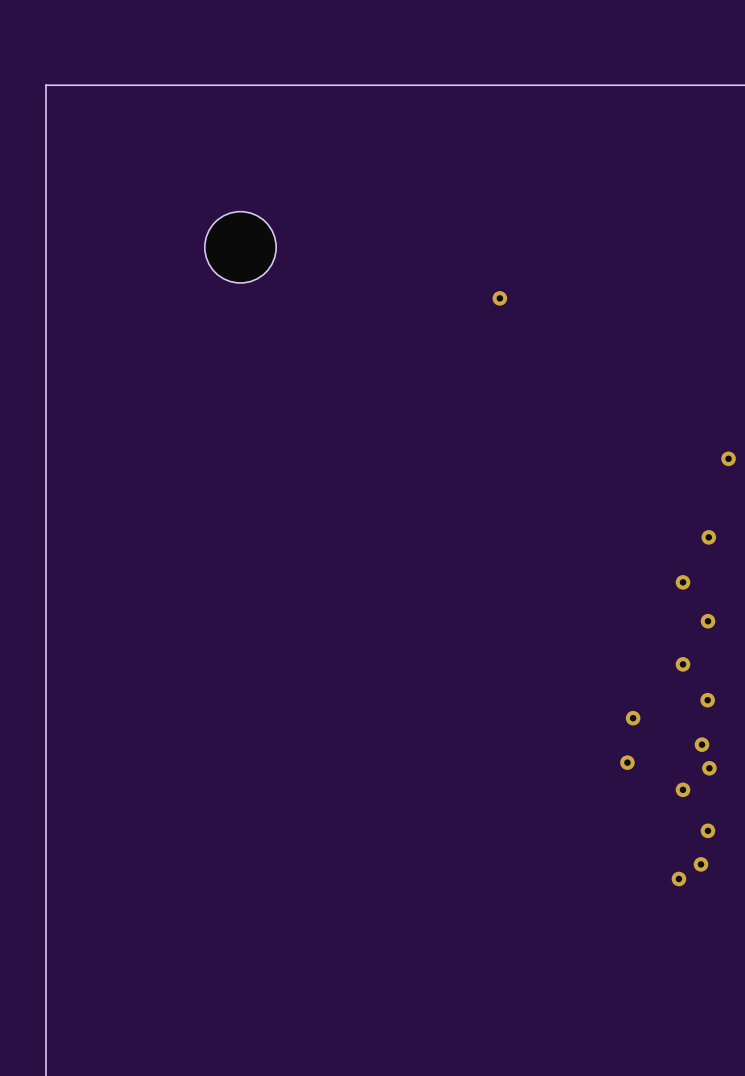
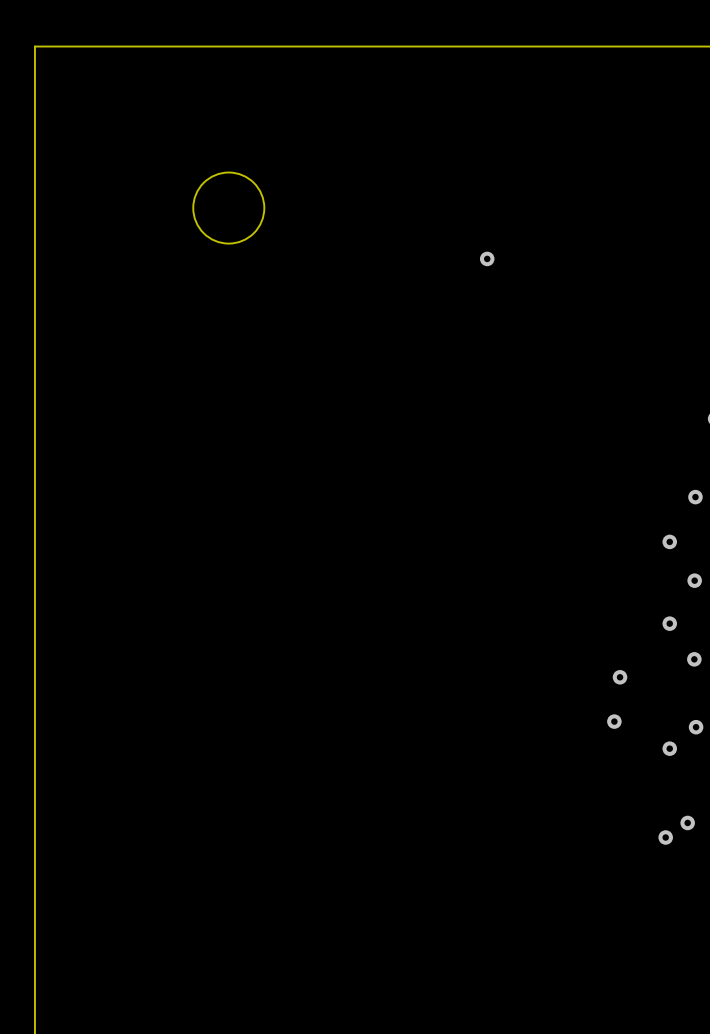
via: (702, 744) -> none
via: (707, 830) -> none

